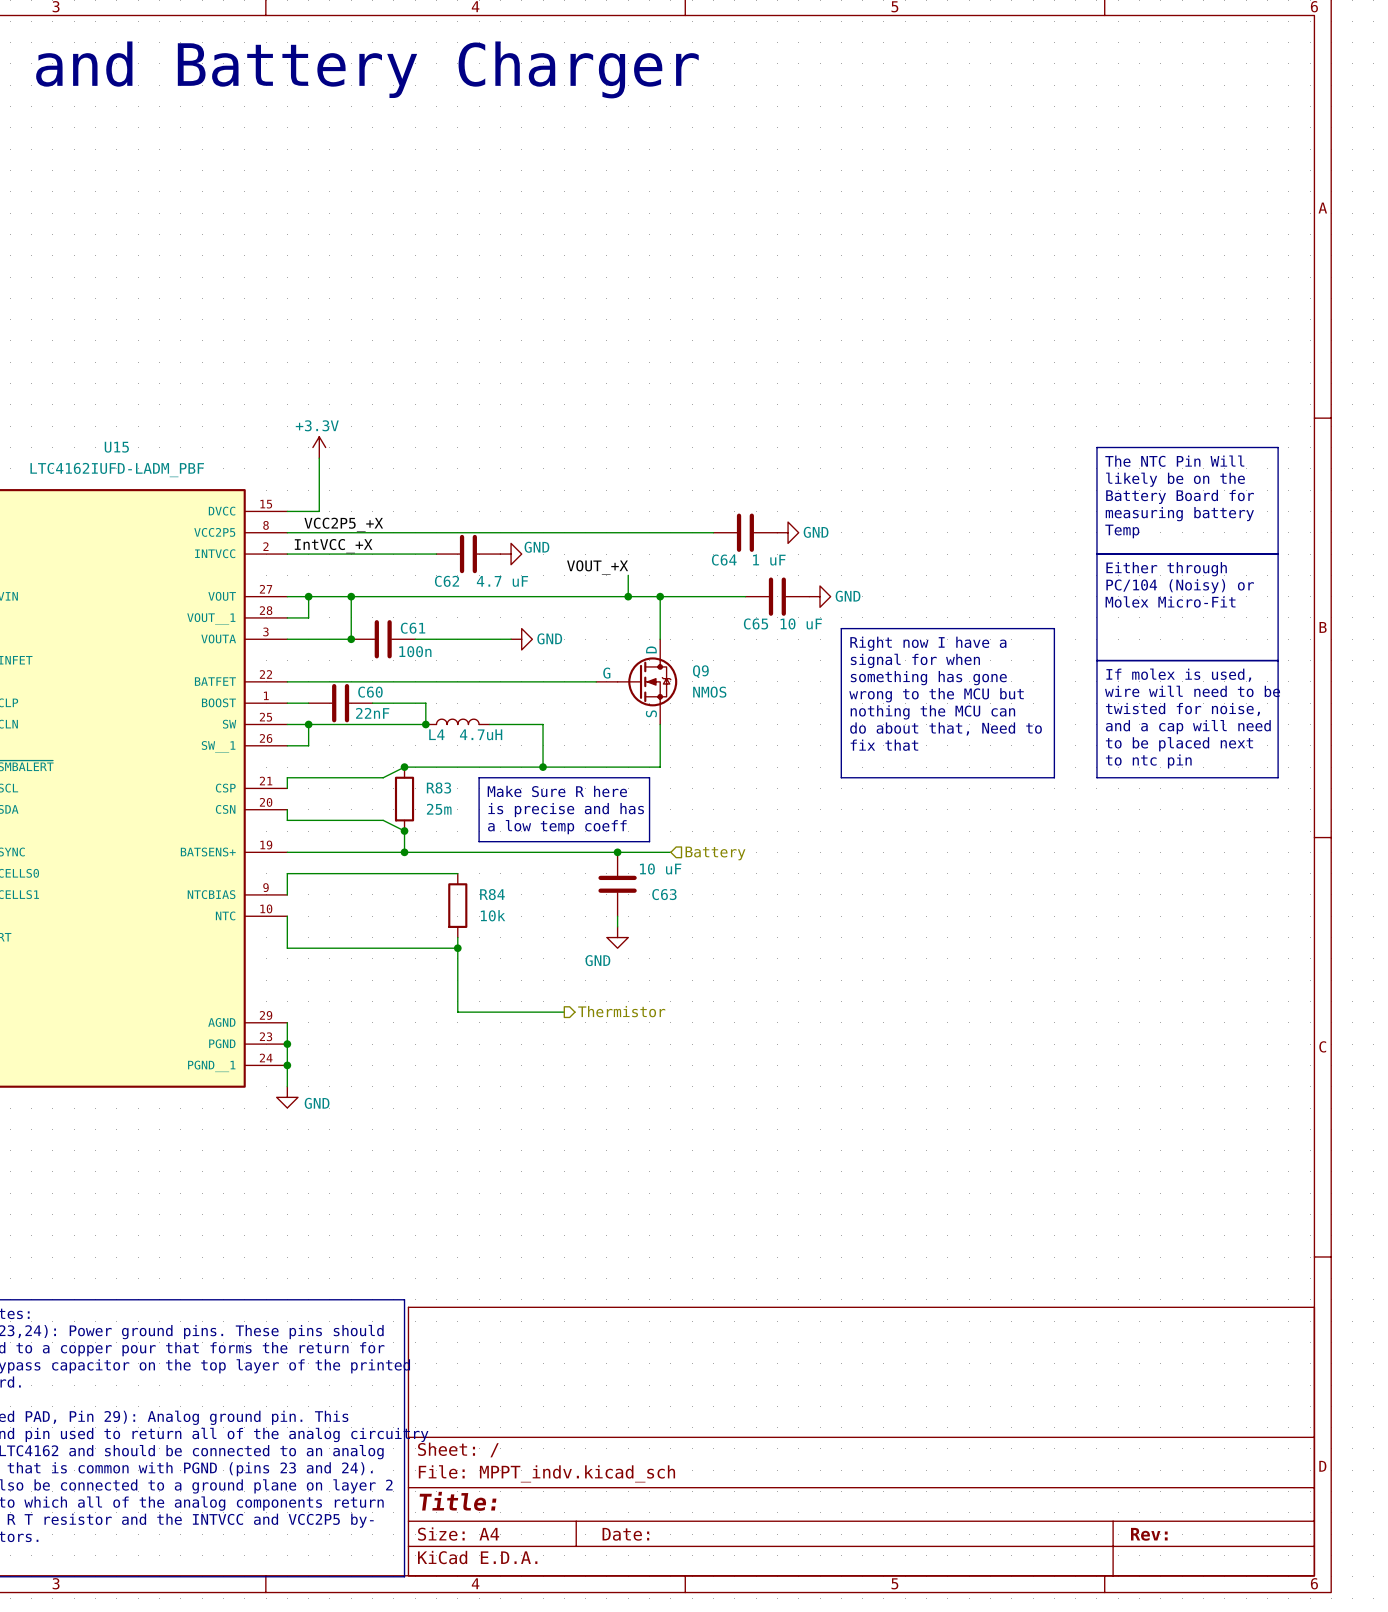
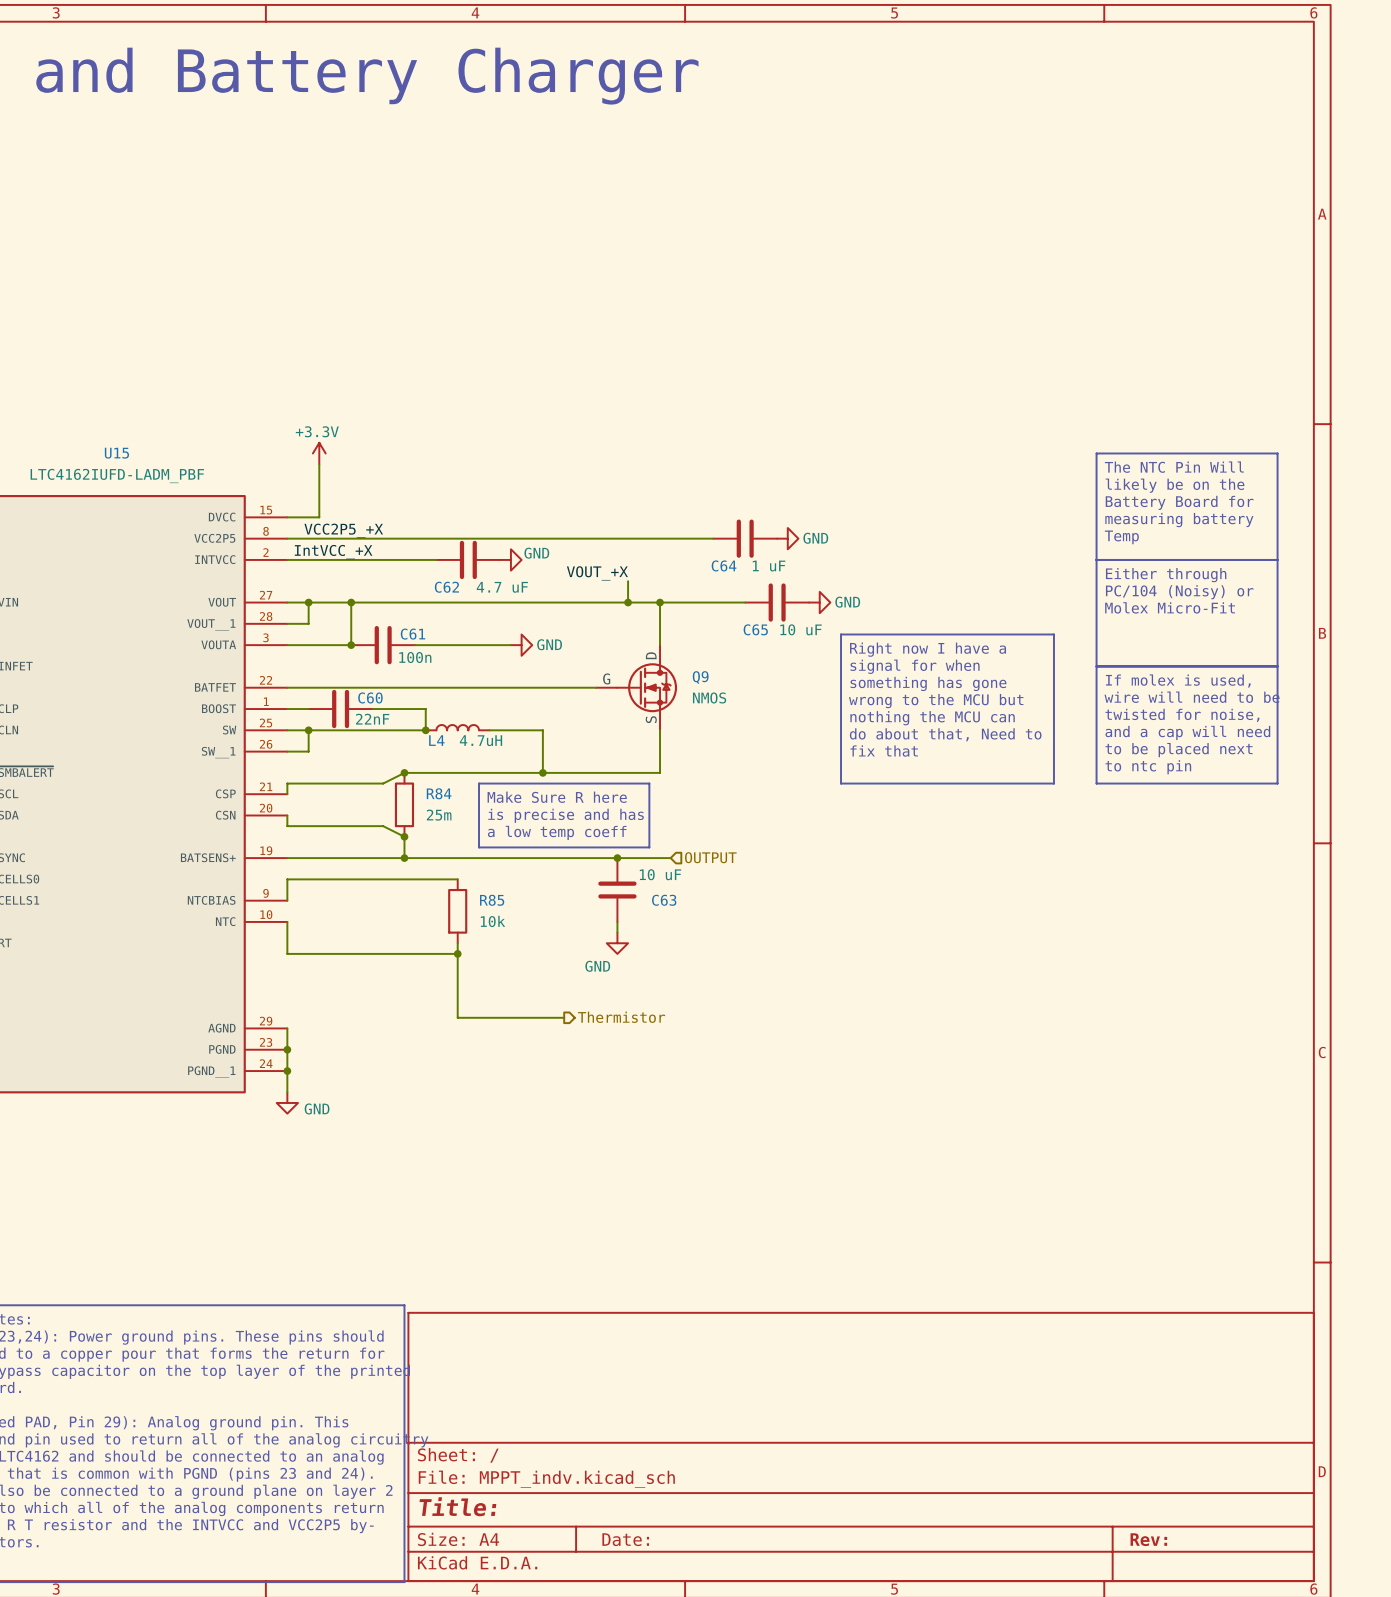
R83 name: R83 (438, 788) -> R84 (439, 793)
hierarchical label: Battery (715, 853) -> OUTPUT (710, 857)
R84 name: R84 (492, 894) -> R85 (492, 900)

